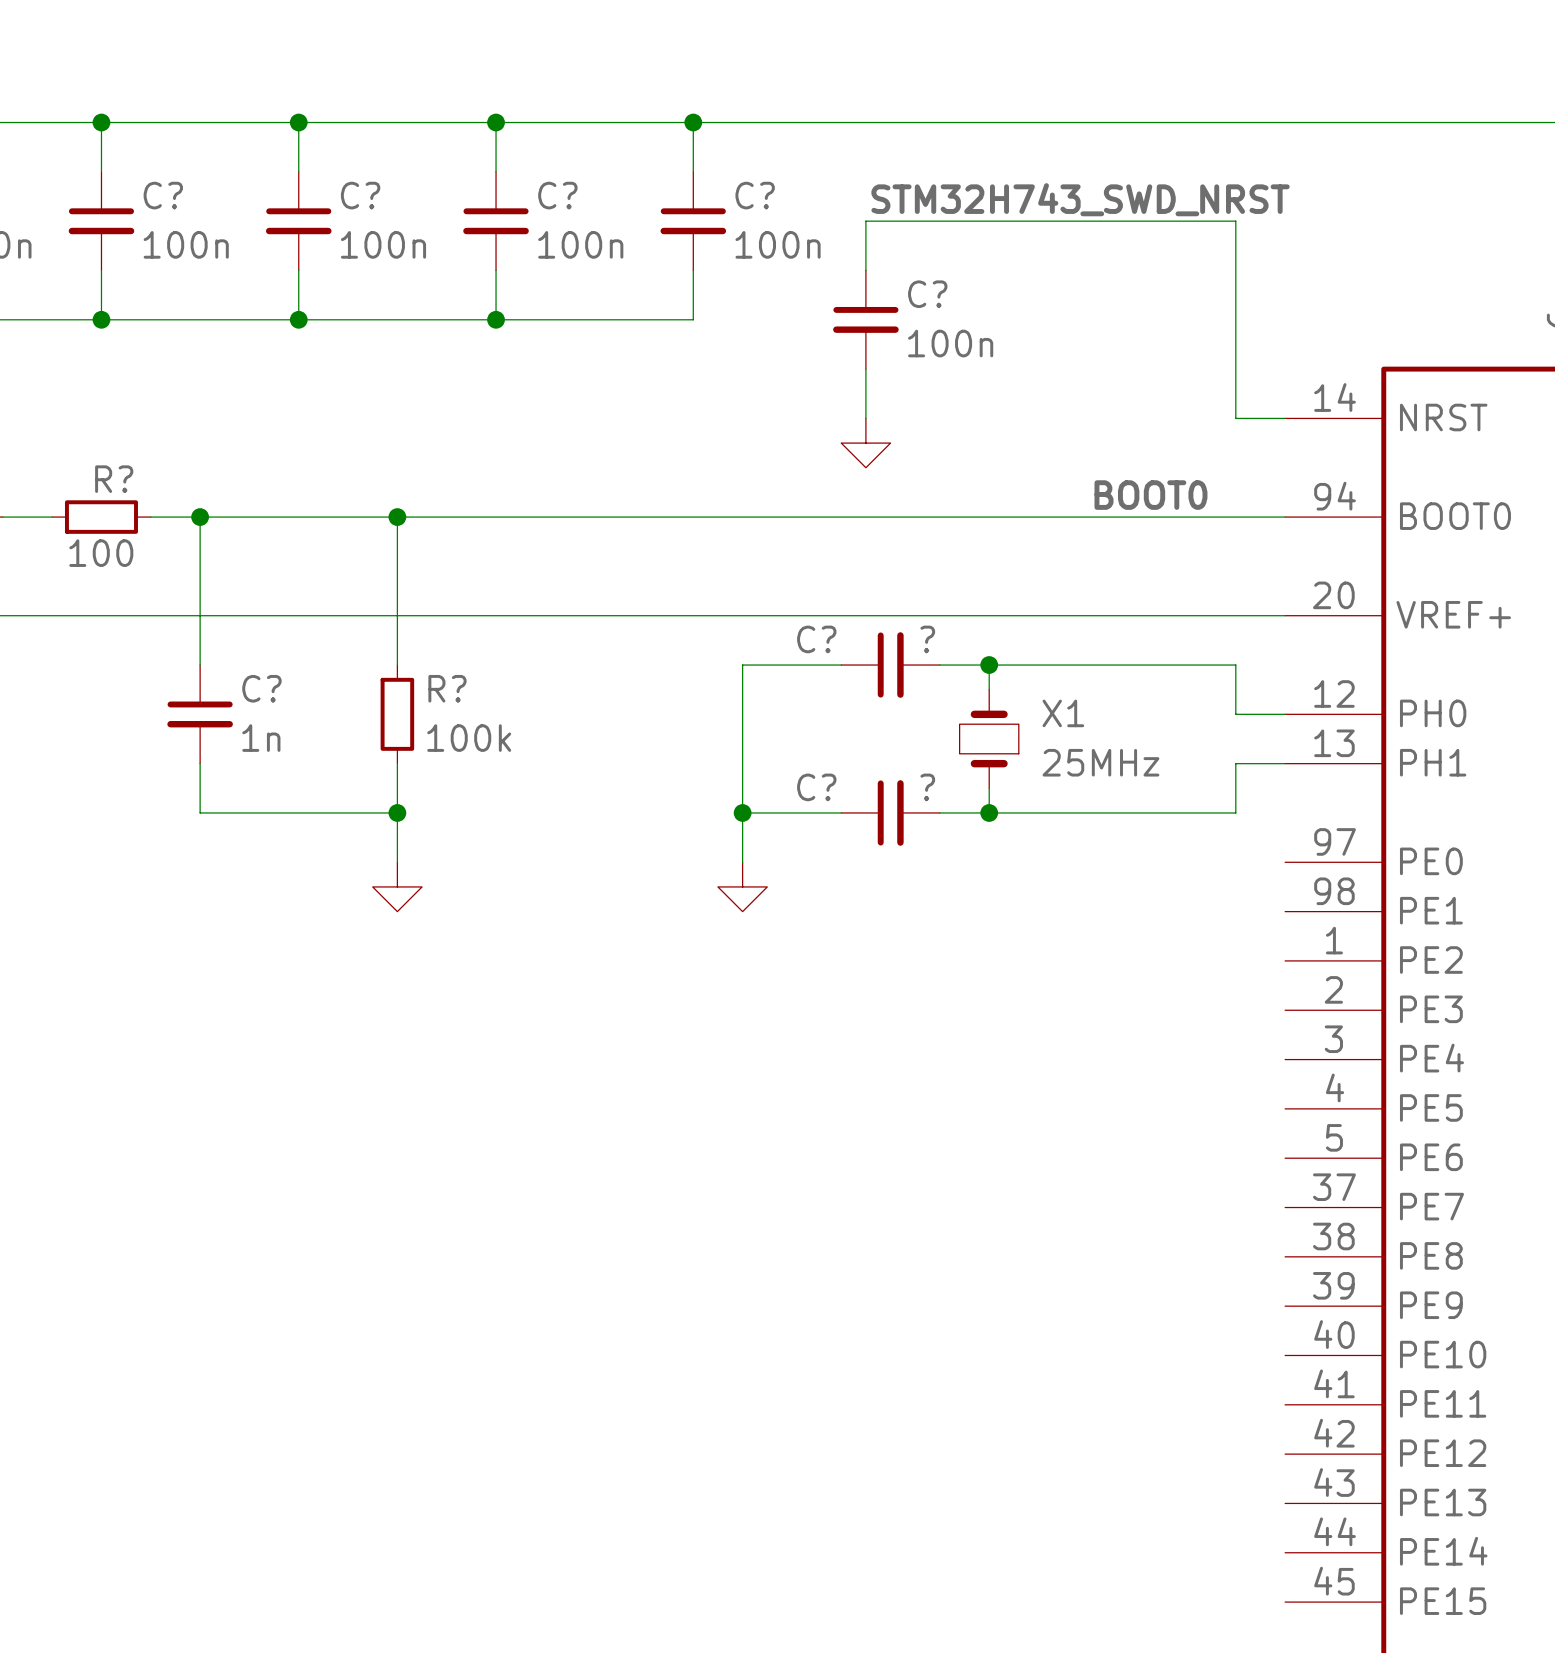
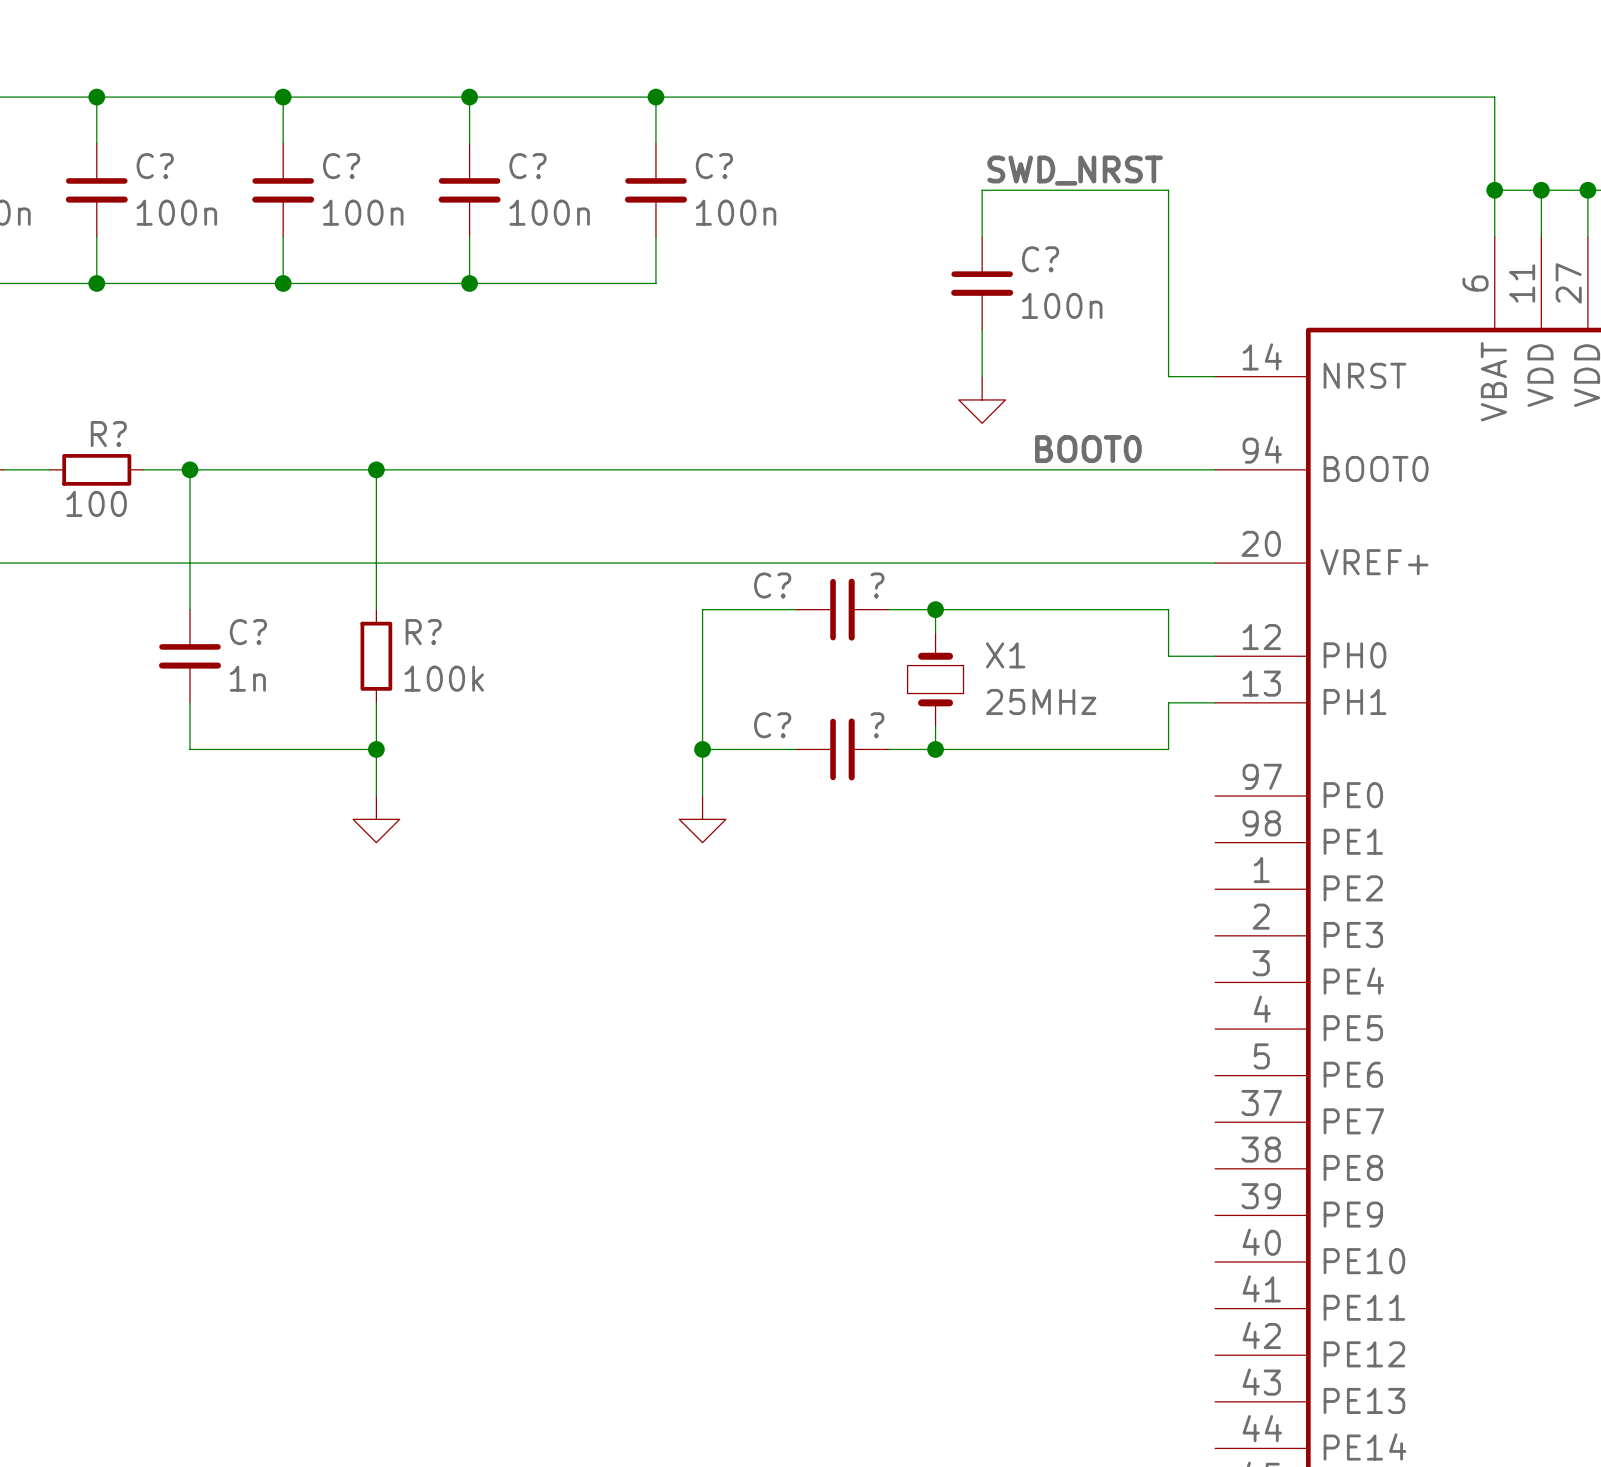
label: STM32H743_SWD_NRST (1080, 199) -> SWD_NRST (1075, 170)
wire: (1038, 221) (865, 221) (865, 270) -> (982, 190) (982, 236)
C? position: (865, 319) -> (982, 283)
wire: (865, 369) (865, 418) -> (982, 330) (982, 376)
power symbol position: (865, 443) -> (982, 399)

